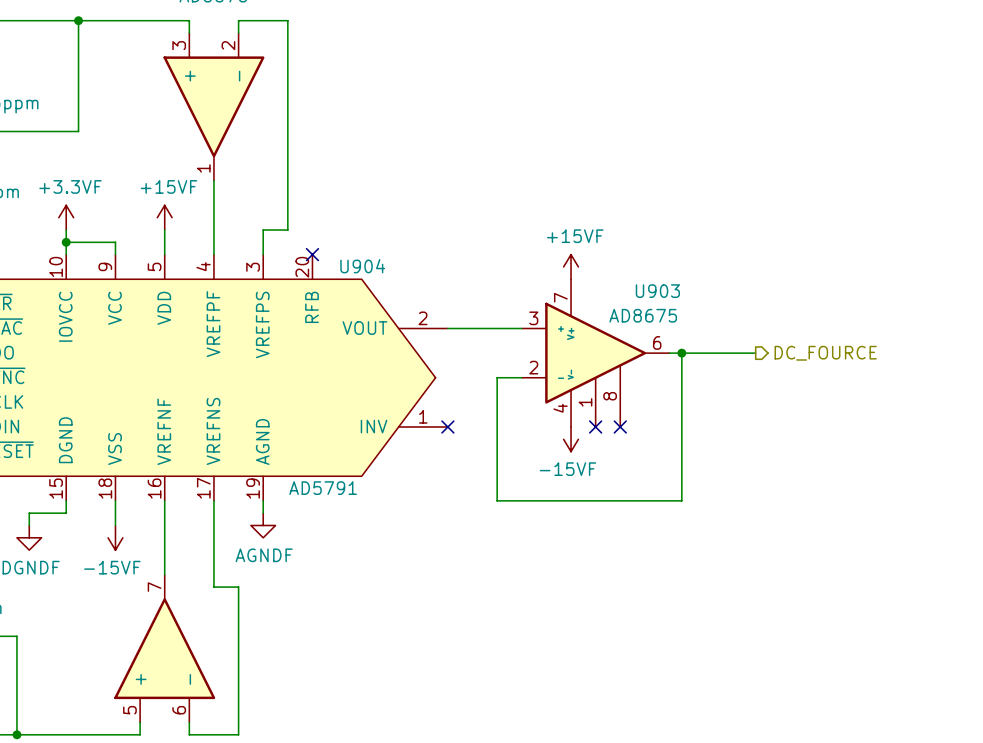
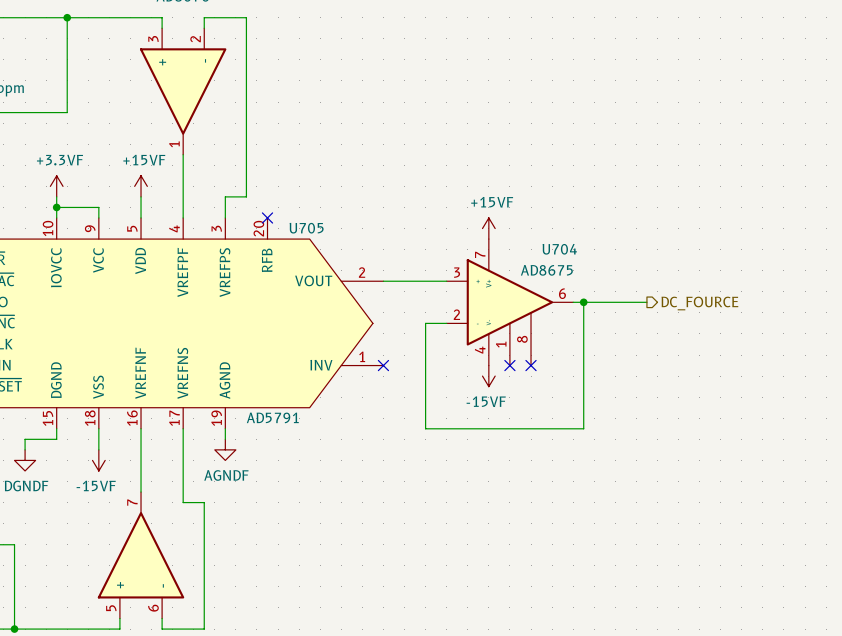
U904 name: U904 (362, 266) -> U705 (306, 228)
U903 name: U903 (657, 291) -> U704 (559, 249)

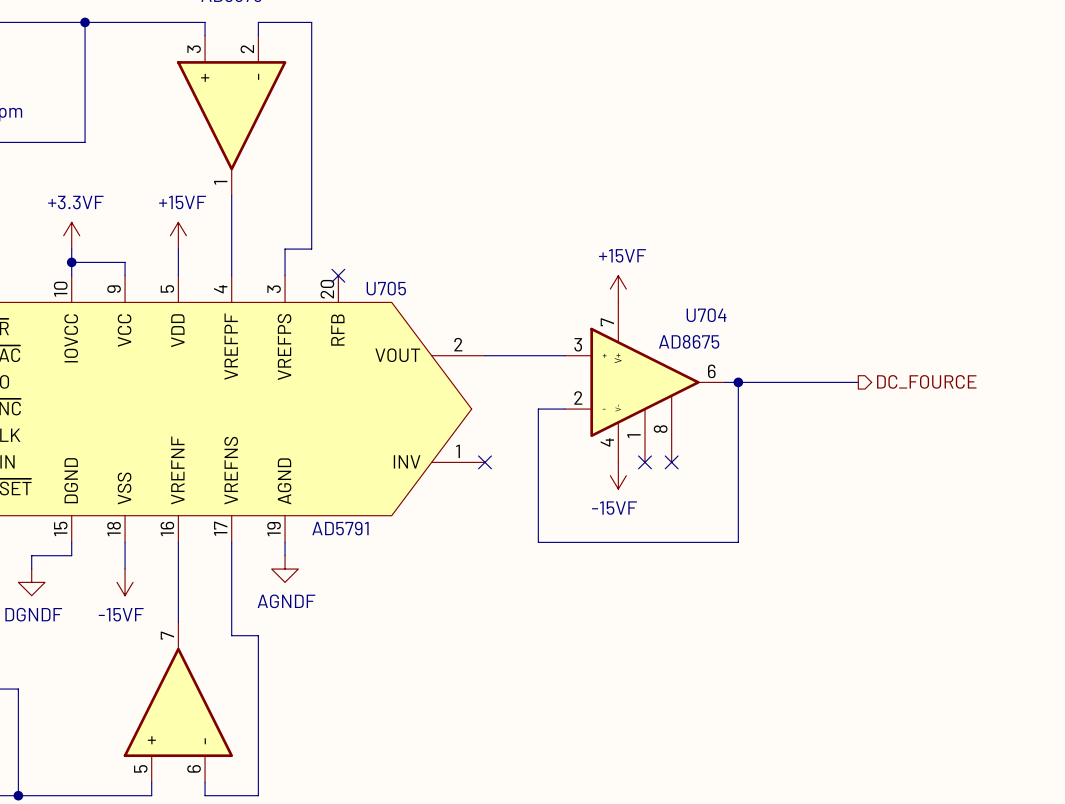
wire: none -> (818, 382) (858, 382)
hierarchical label position: DC_FOURCE (699, 303) -> DC_FOURCE (926, 381)

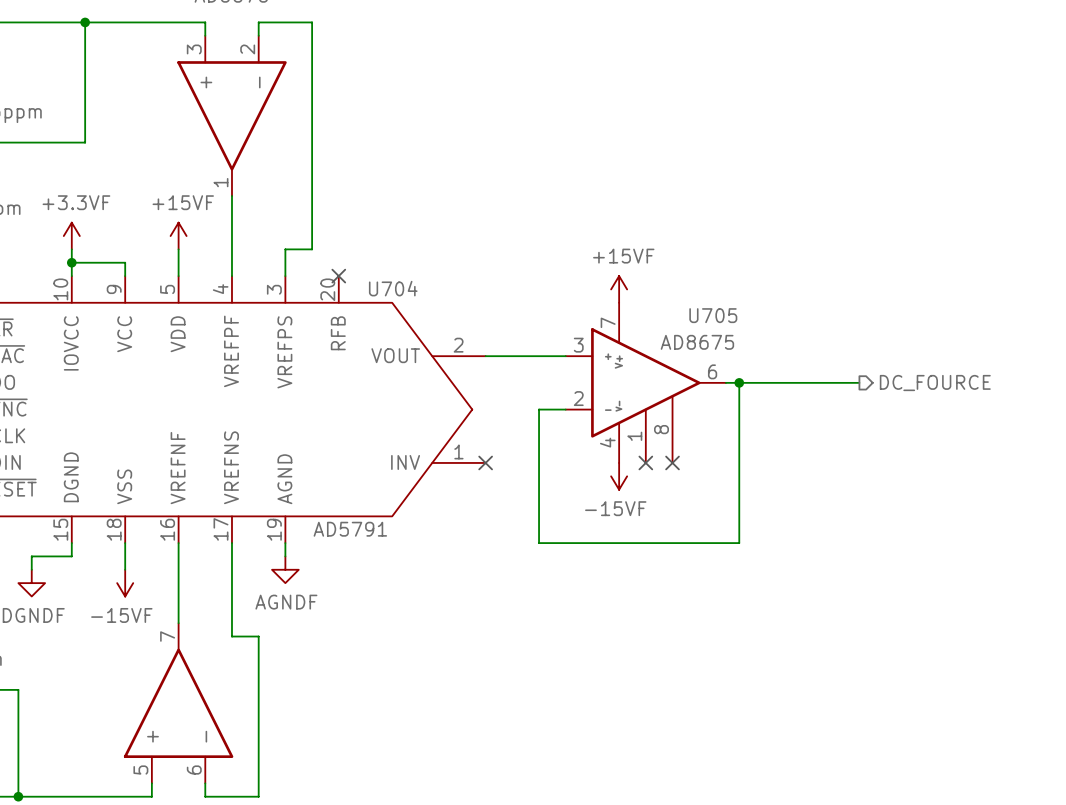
U705 name: U705 (386, 288) -> U704 (393, 288)
U704 name: U704 (706, 315) -> U705 (713, 315)

